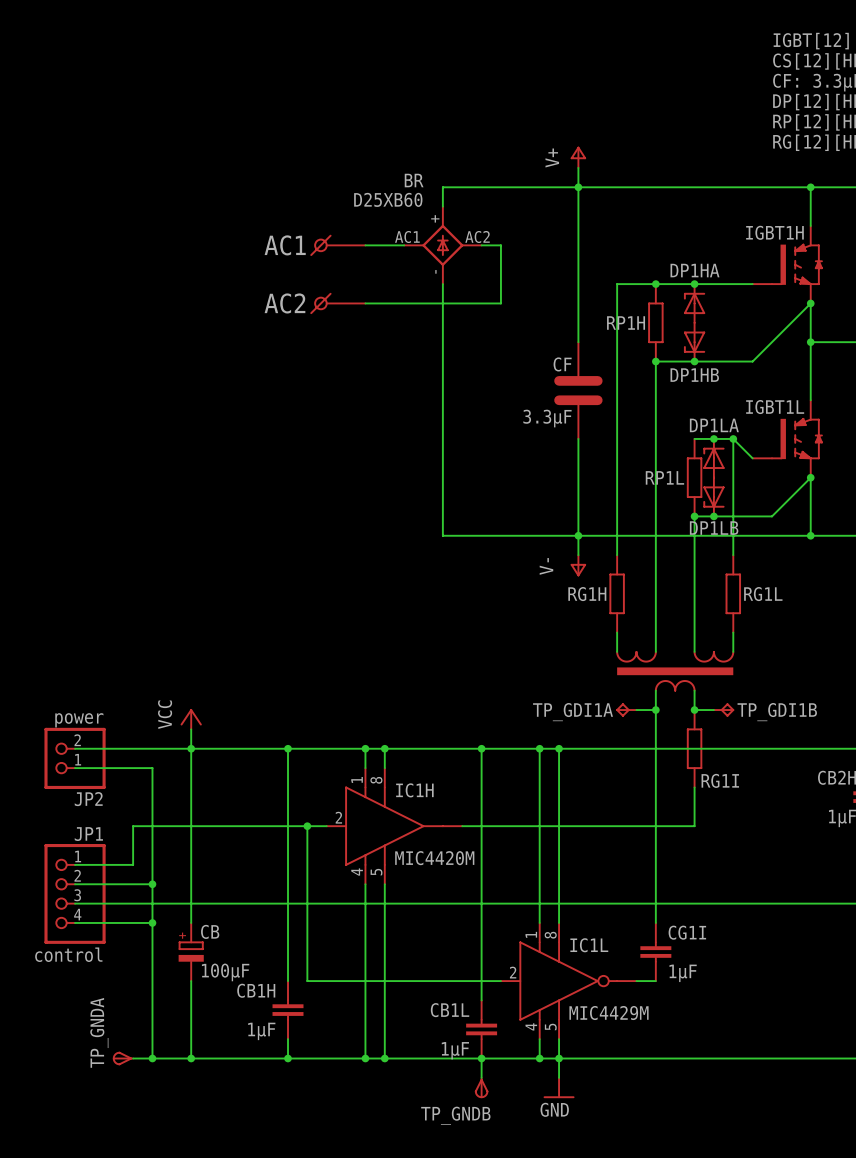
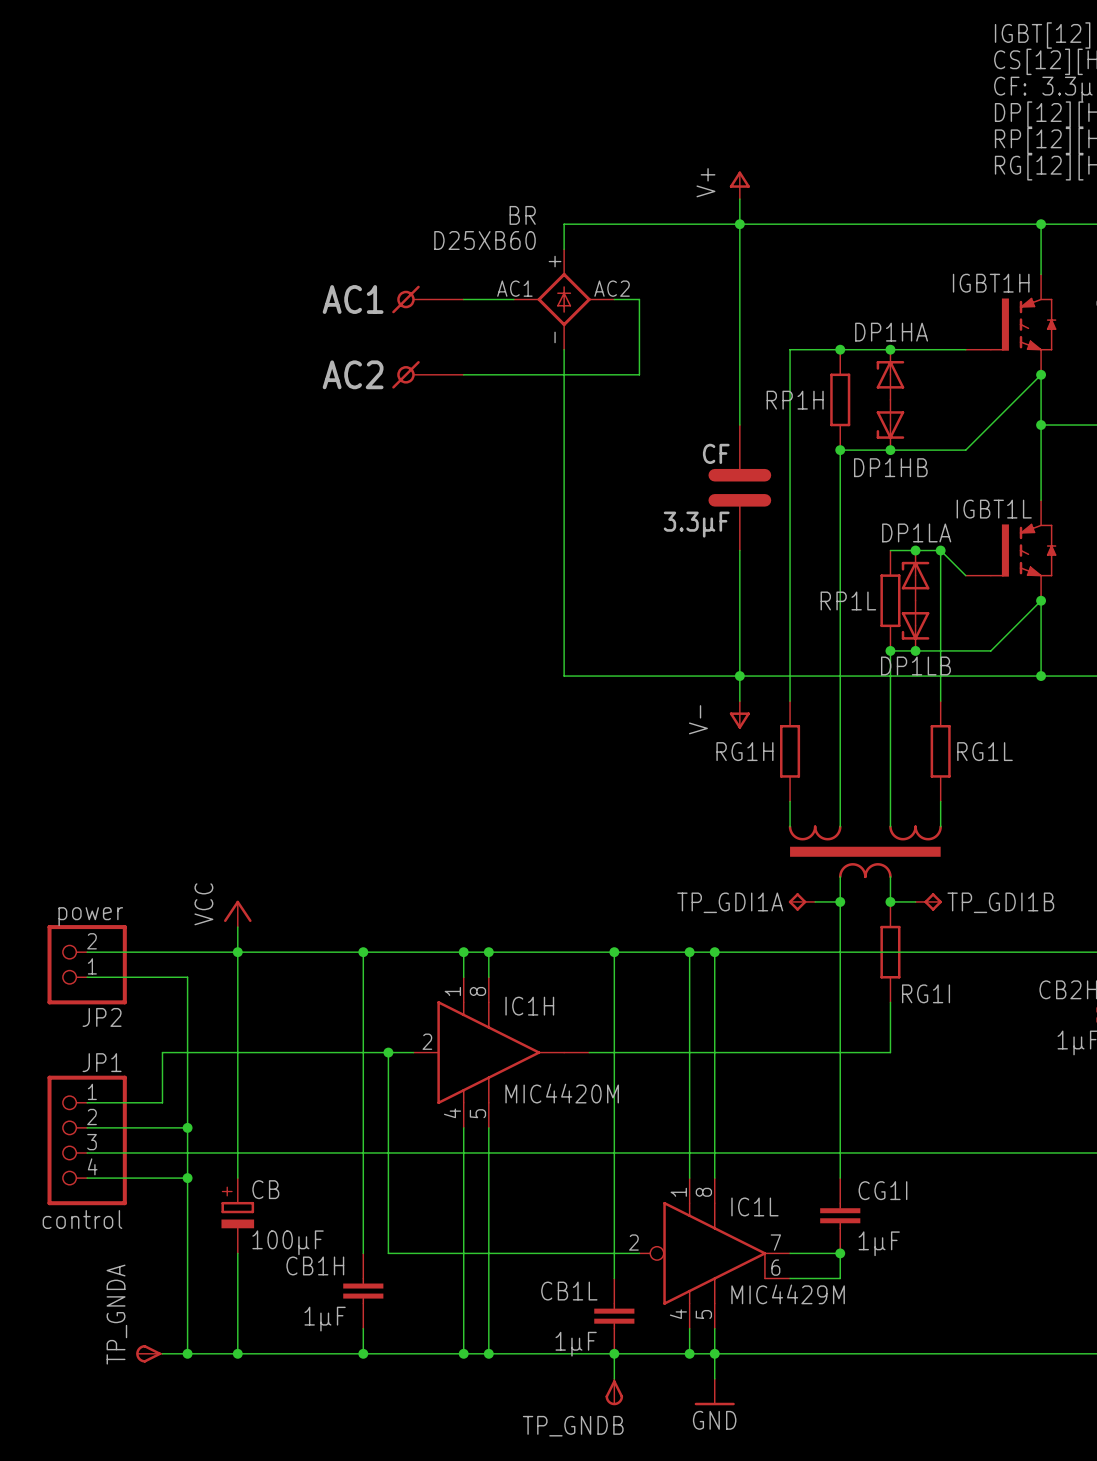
IC1L symbol: [500, 922, 637, 1040] -> [639, 1178, 791, 1329]
wire: none -> (840, 1253) (840, 1278) (790, 1278)
junction: none -> (840, 1253)

